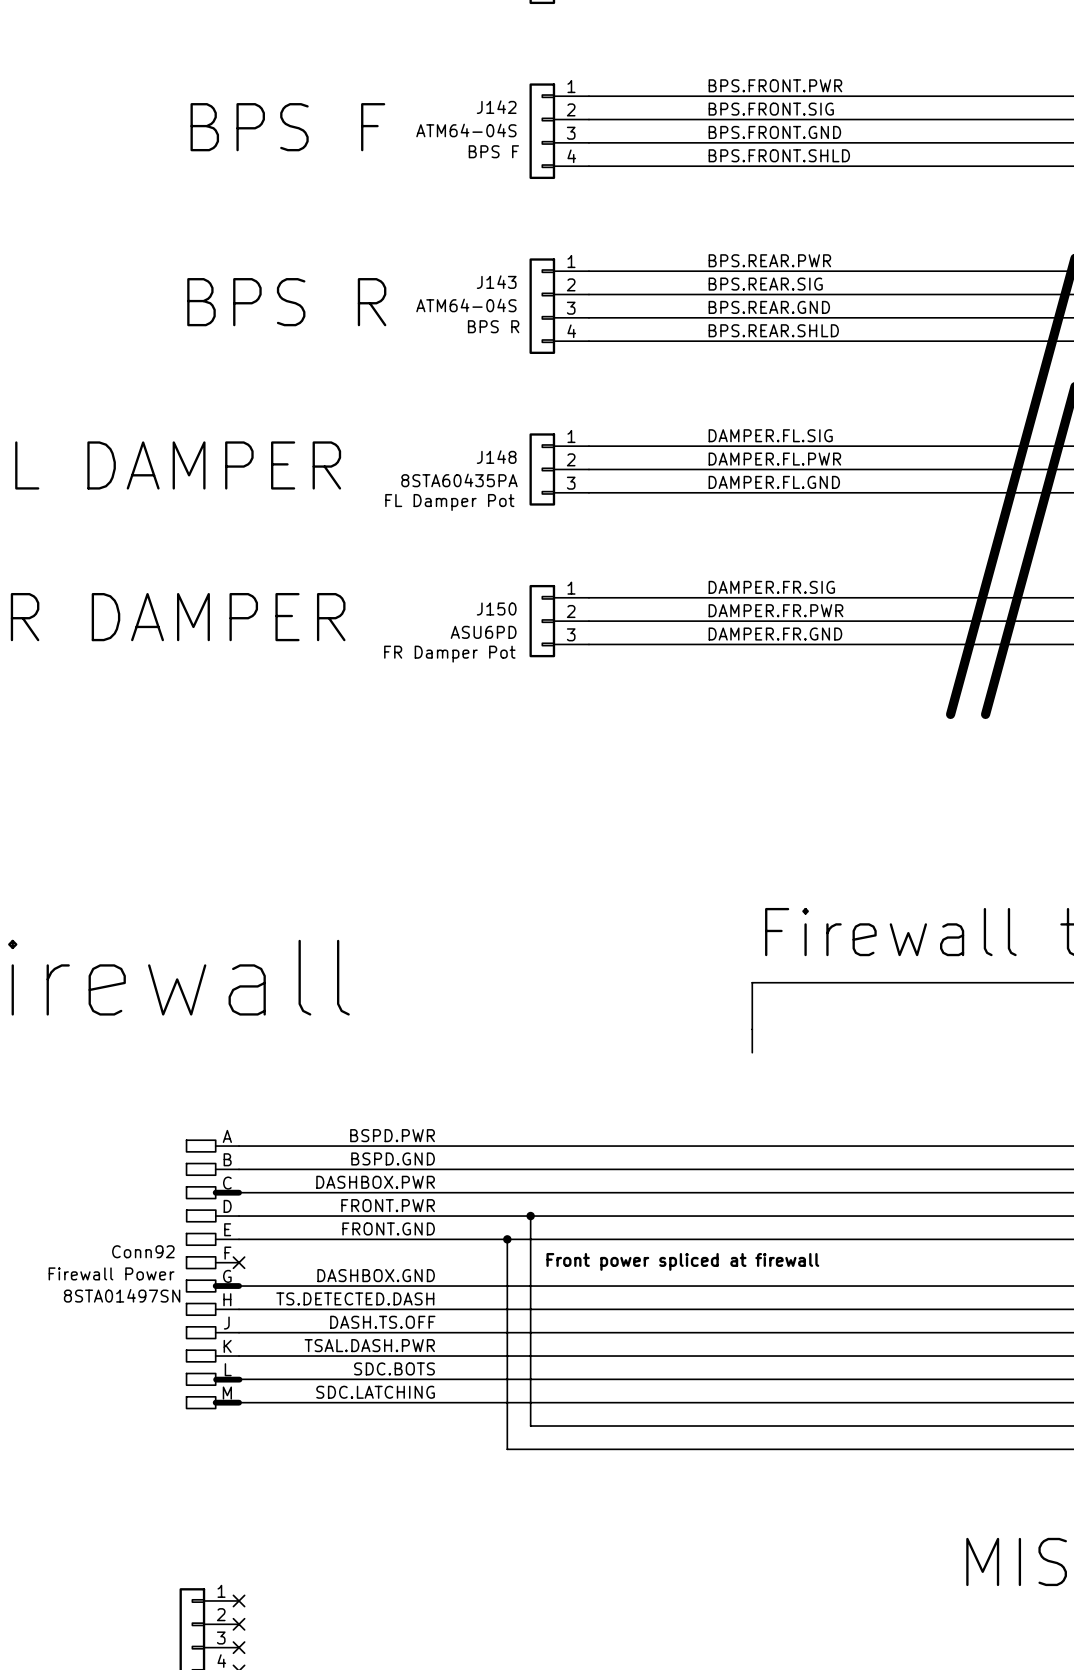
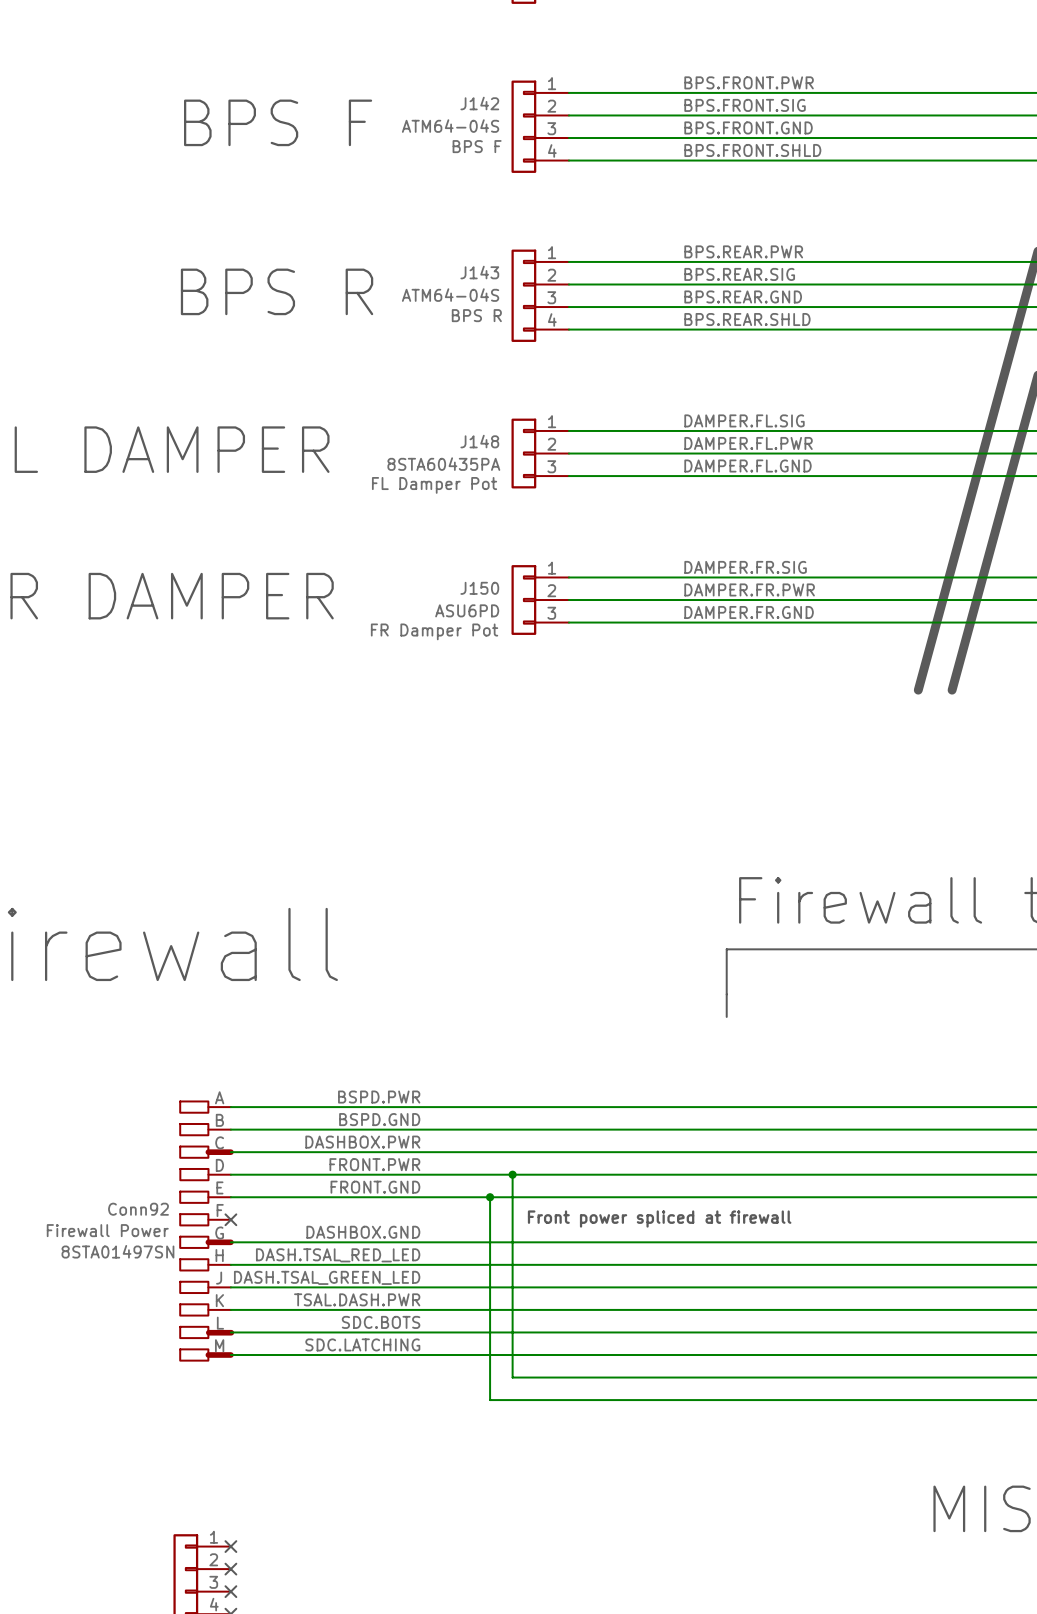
label: TS.DETECTED.DASH (355, 1298) -> DASH.TSAL_RED_LED (338, 1255)
label: DASH.TS.OFF (382, 1322) -> DASH.TSAL_GREEN_LED (327, 1277)

